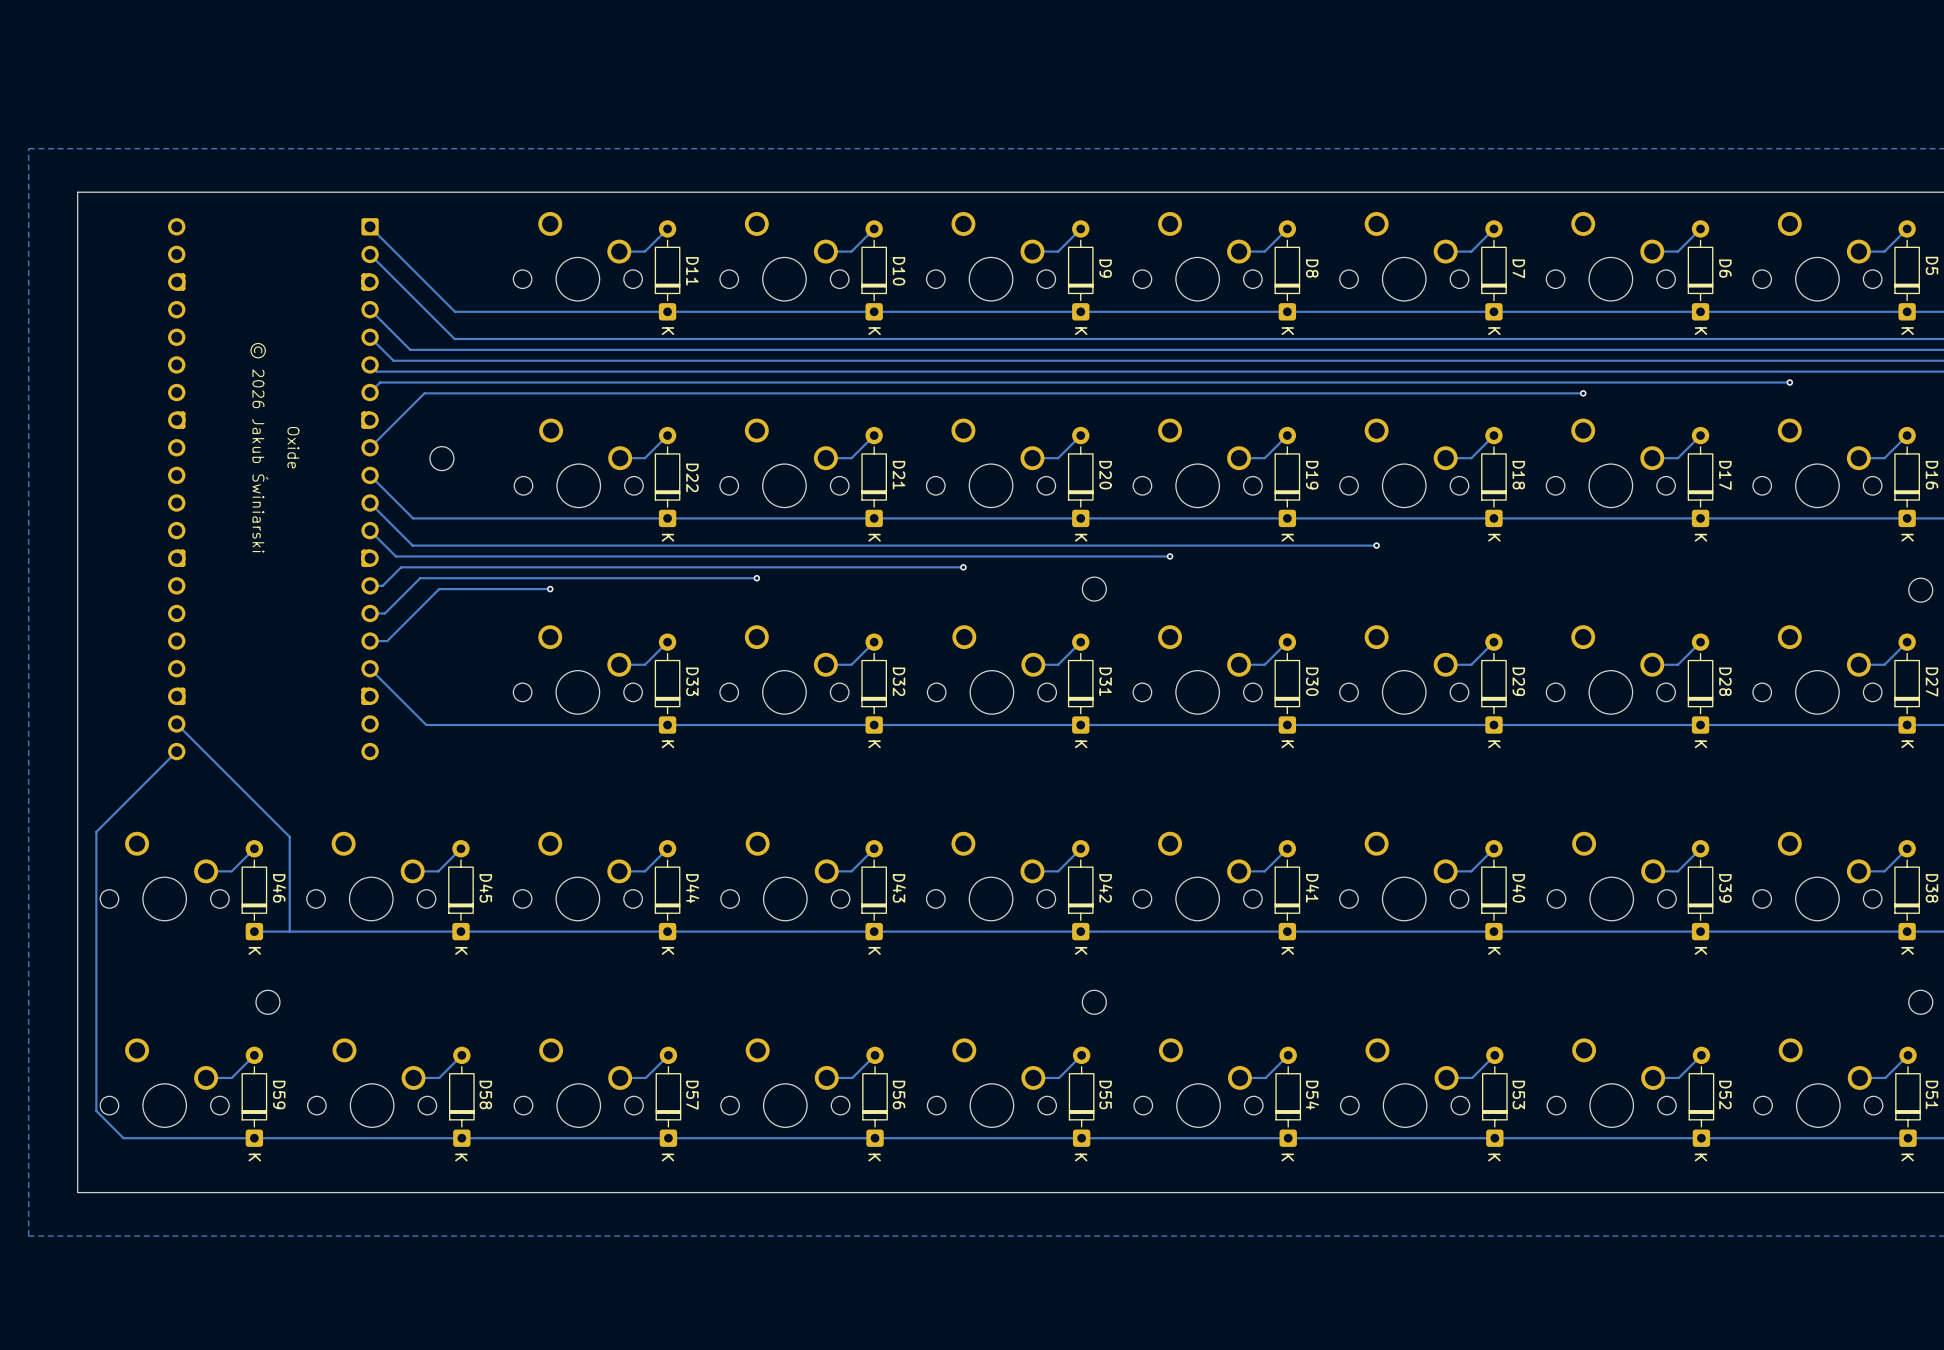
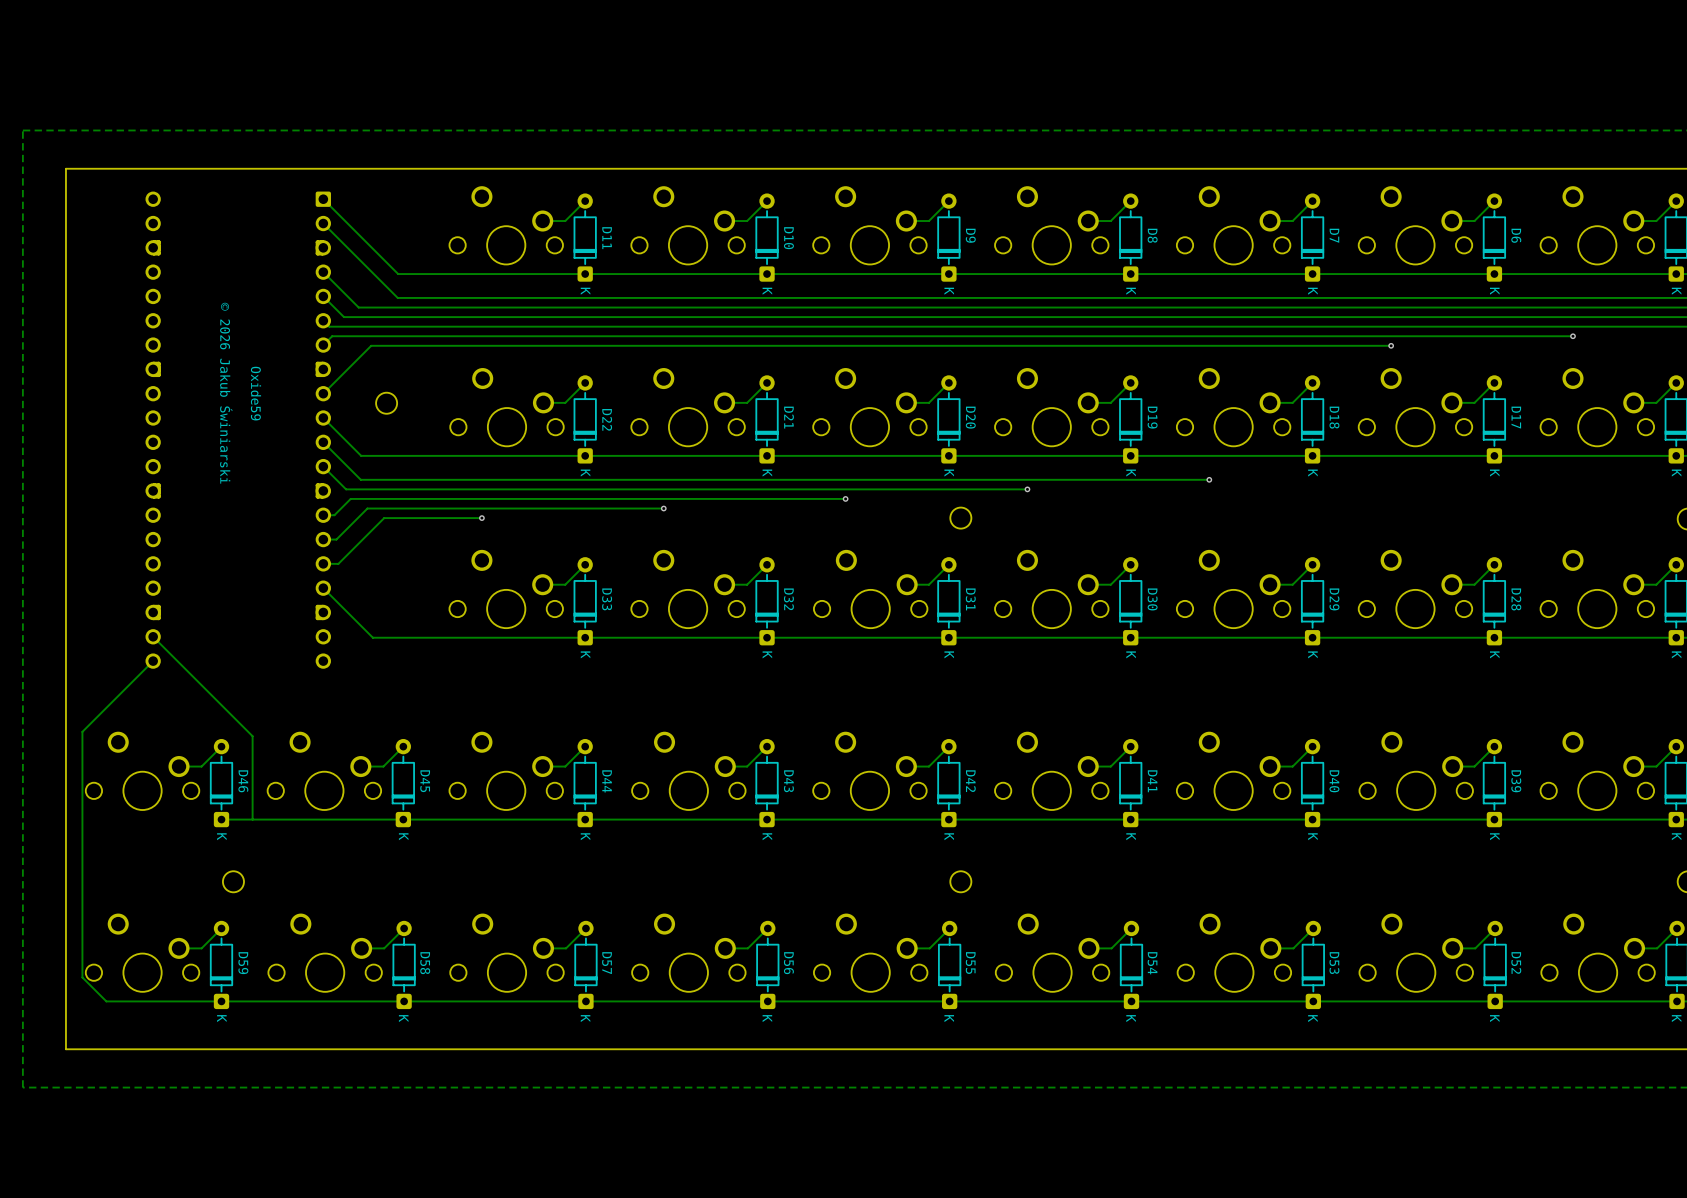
text: Oxide (293, 447) -> Oxide59 (255, 393)

